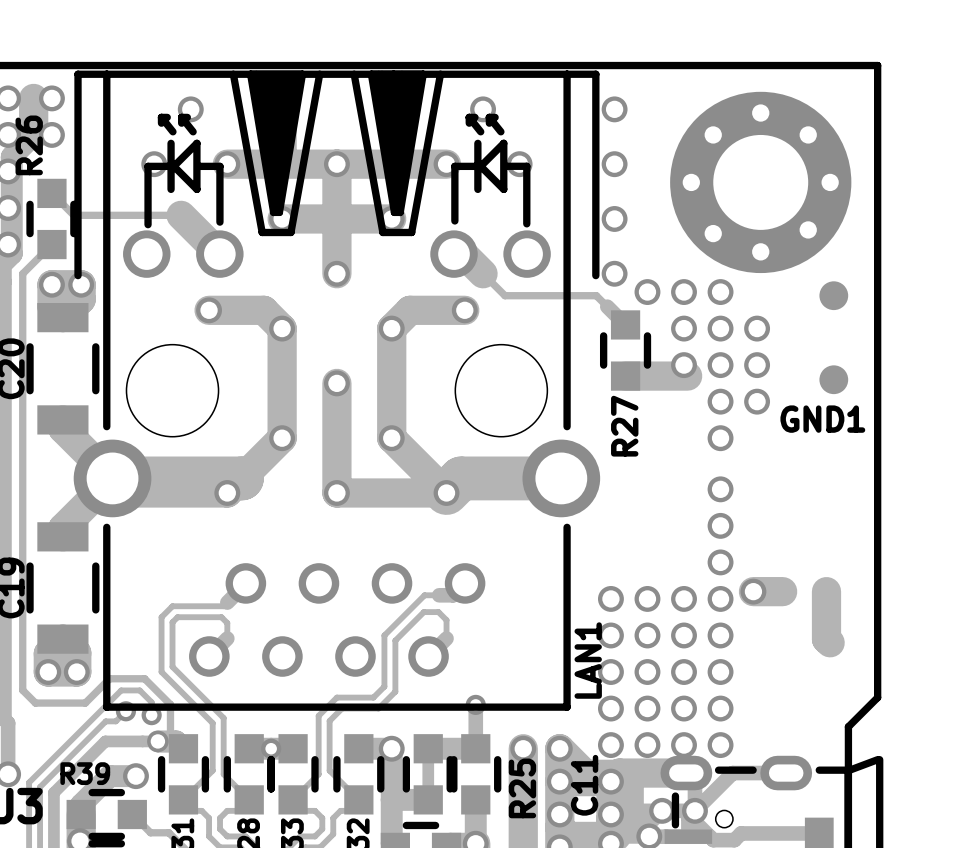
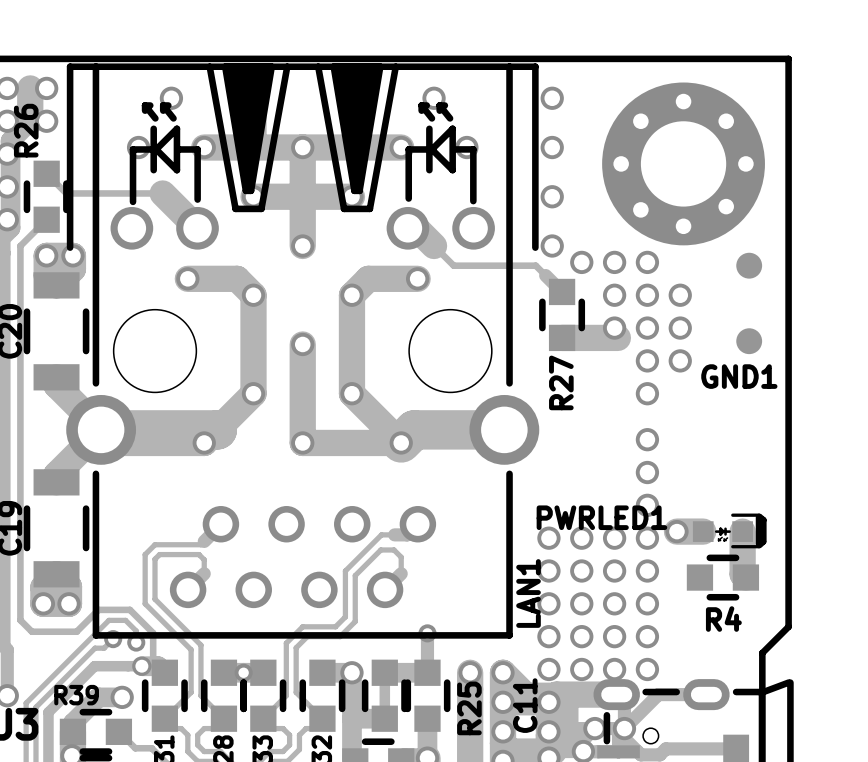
PWRLED1: none -> (729, 530)
R4: none -> (722, 577)

